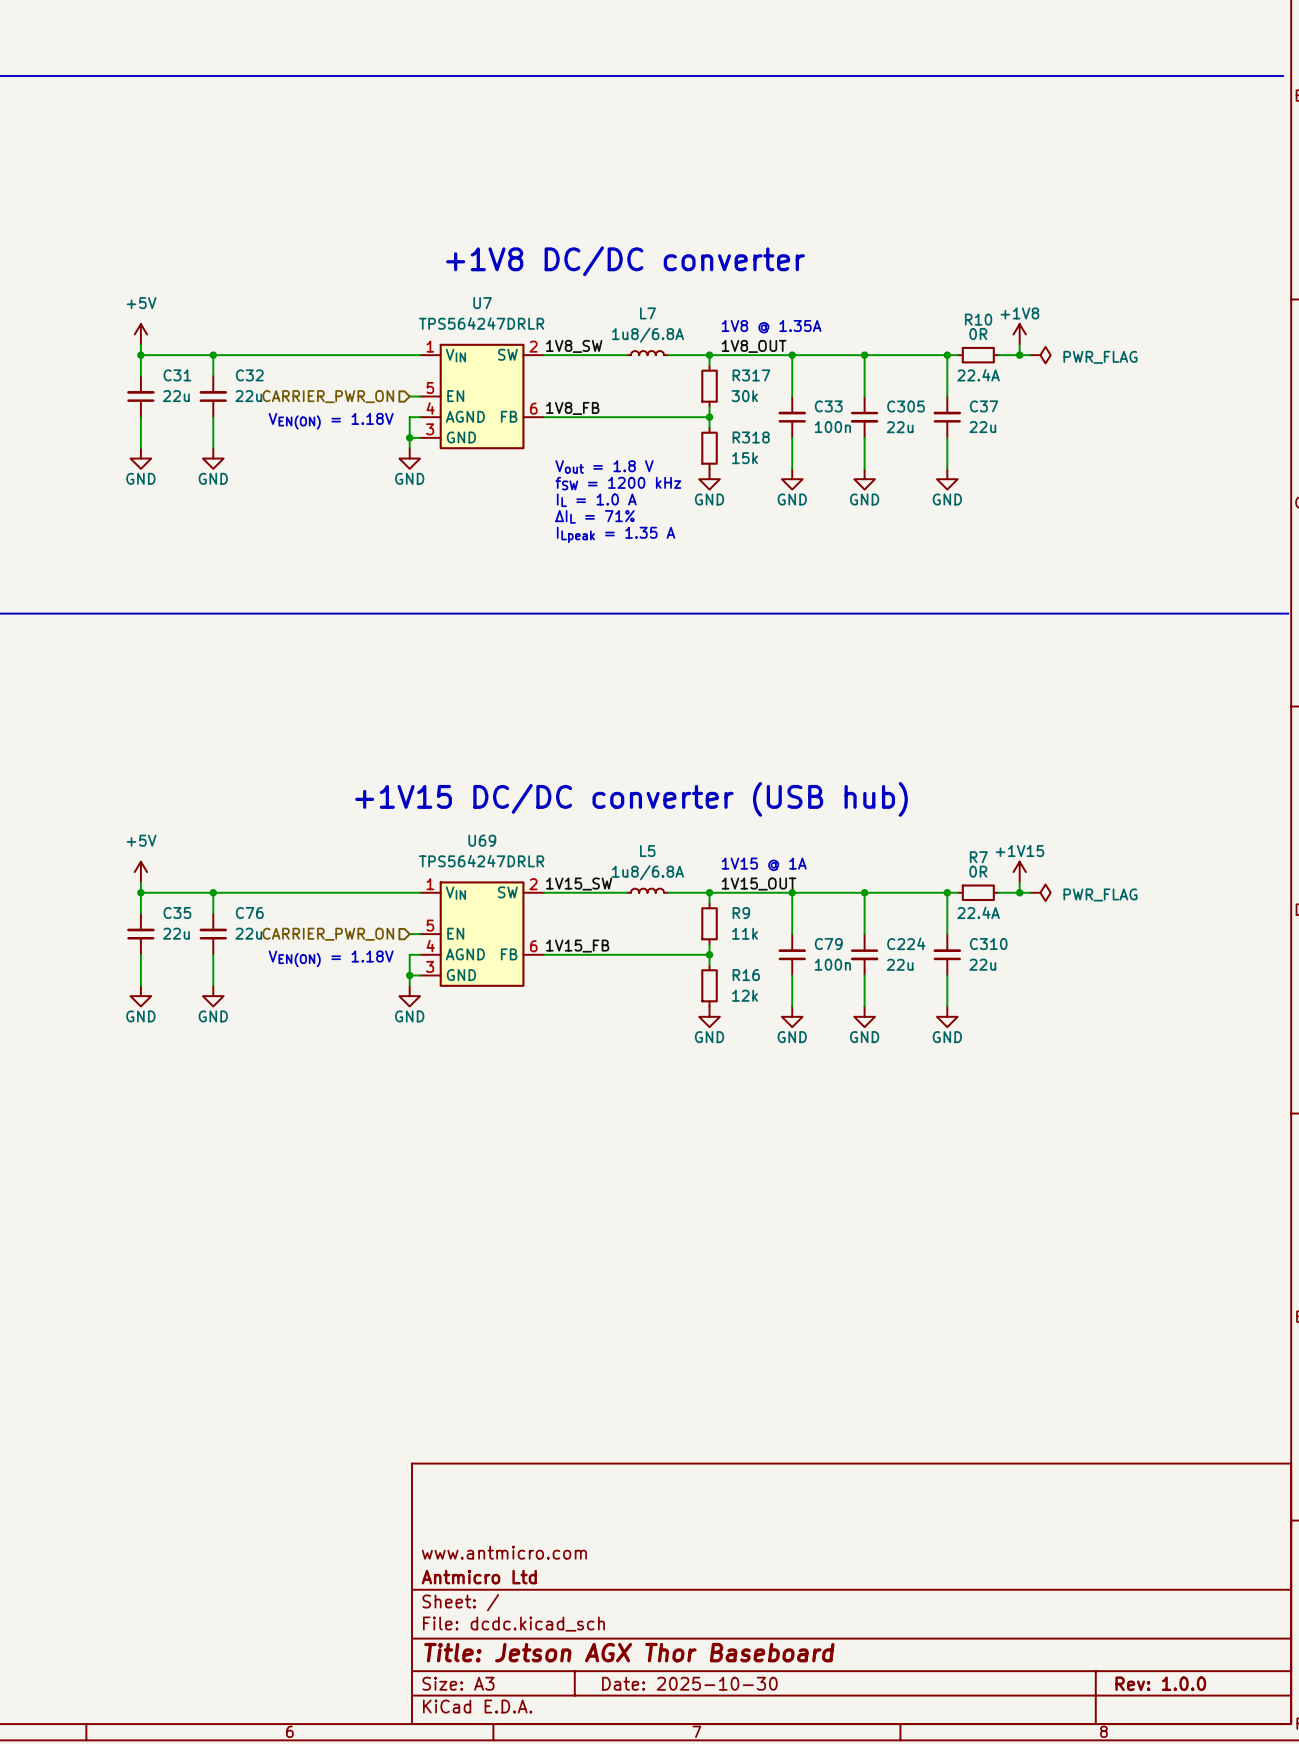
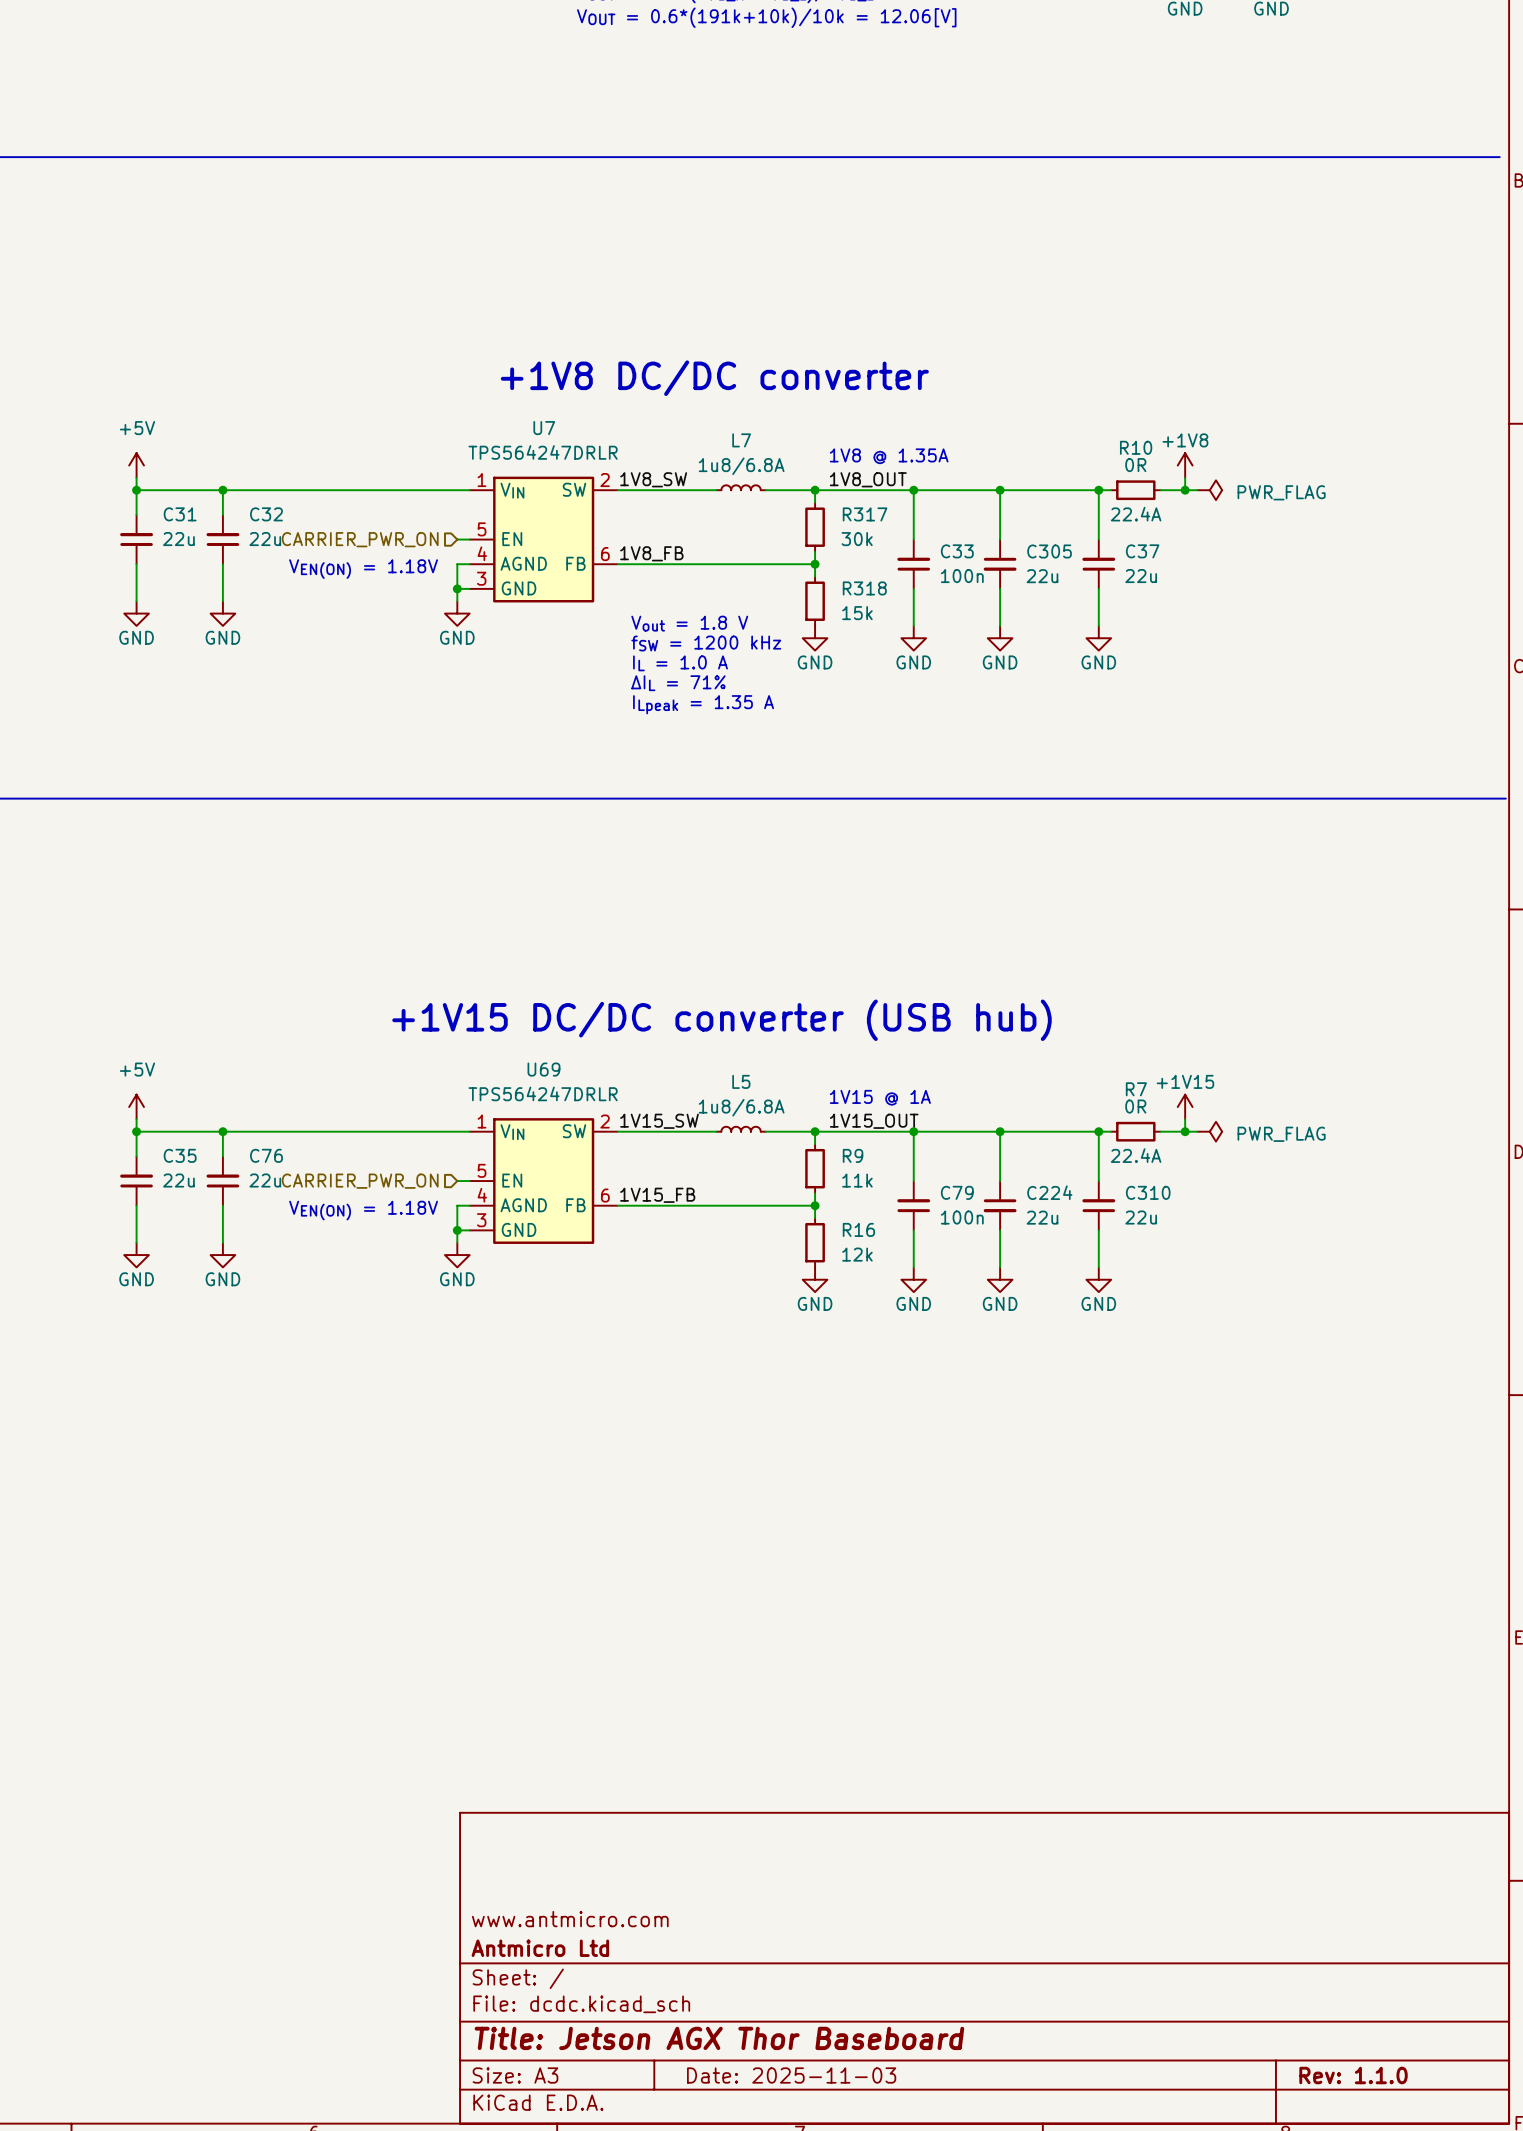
title block: Date: 2025-10-30 (689, 1683) -> Date: 2025-11-03 (791, 2075)
title block: Rev: 1.0.0 (1160, 1683) -> Rev: 1.1.0 (1353, 2075)

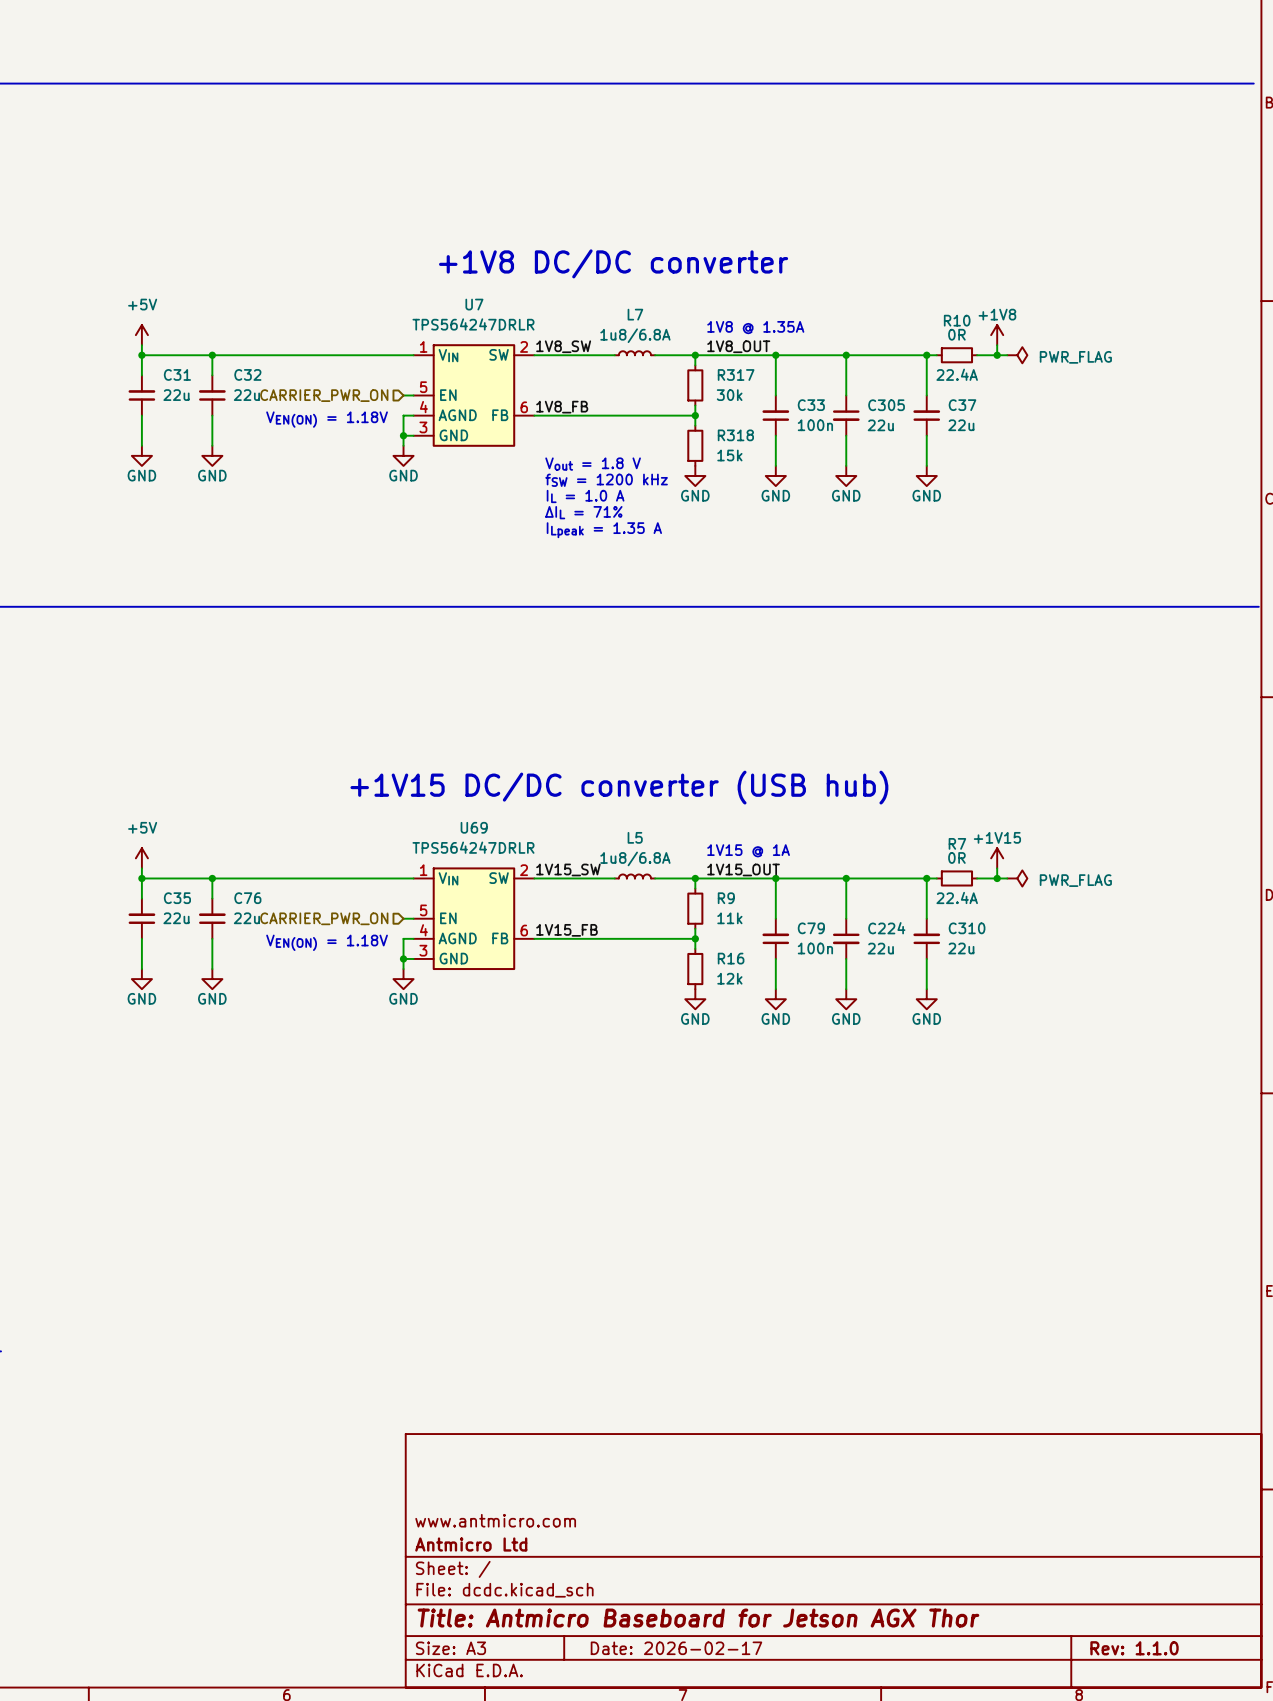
title block: Title: Jetson AGX Thor Baseboard (719, 2038) -> Title: Antmicro Baseboard for Jetson AGX Thor (698, 1618)
title block: Date: 2025-11-03 (791, 2075) -> Date: 2026-02-17 (676, 1648)

